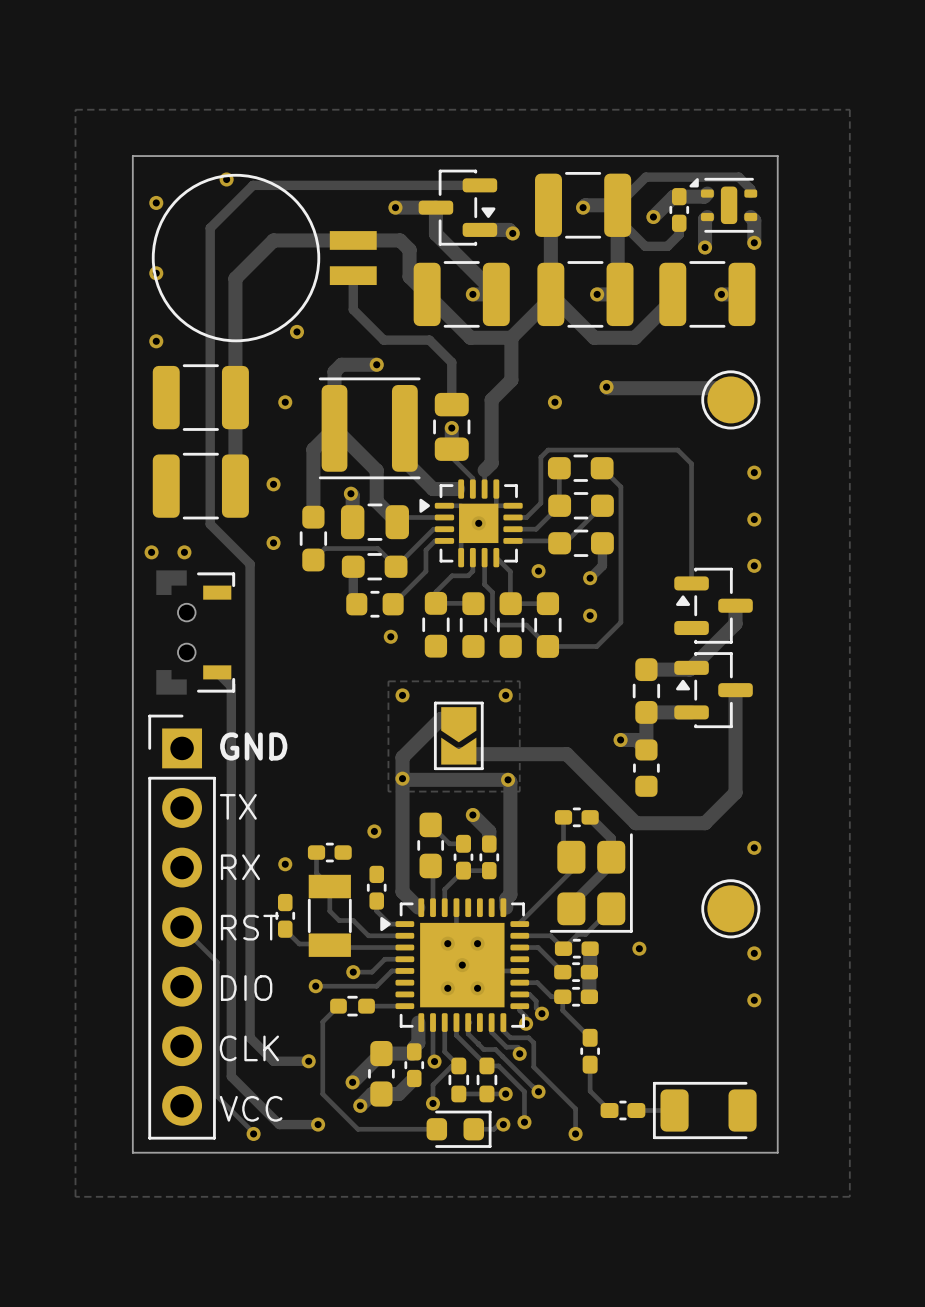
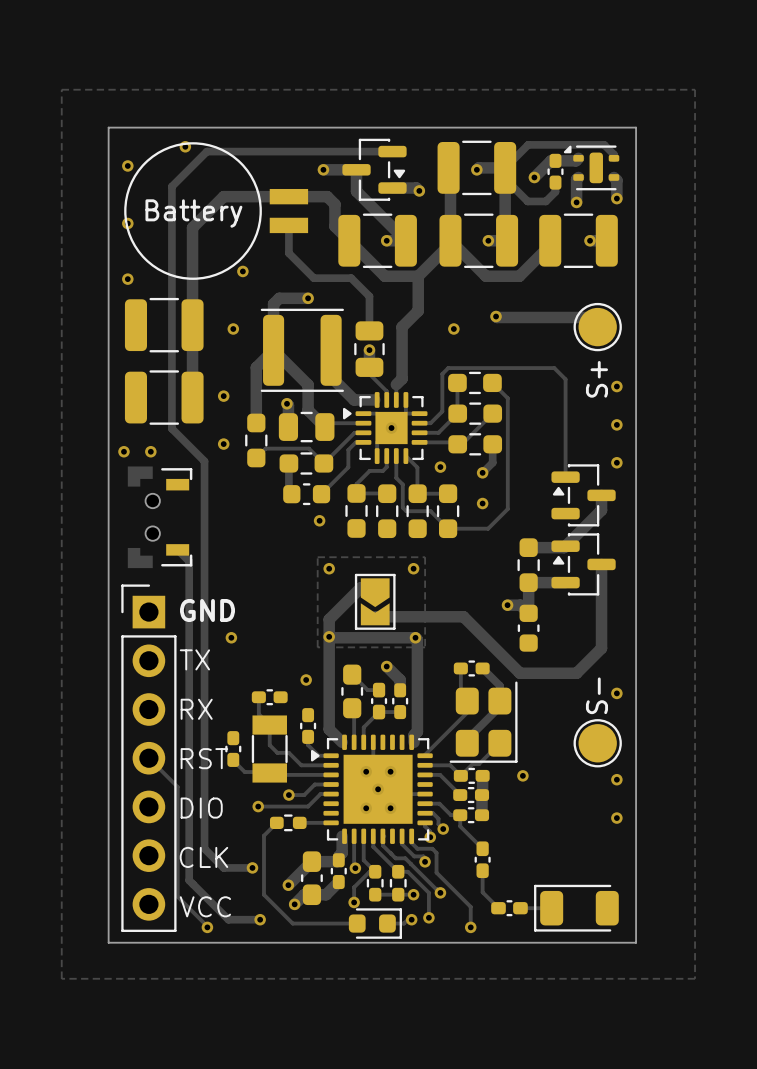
part value: none -> Battery (193, 213)
part value: none -> S+ (596, 379)
part value: none -> S- (596, 695)
via position: (285, 864) -> (231, 637)

